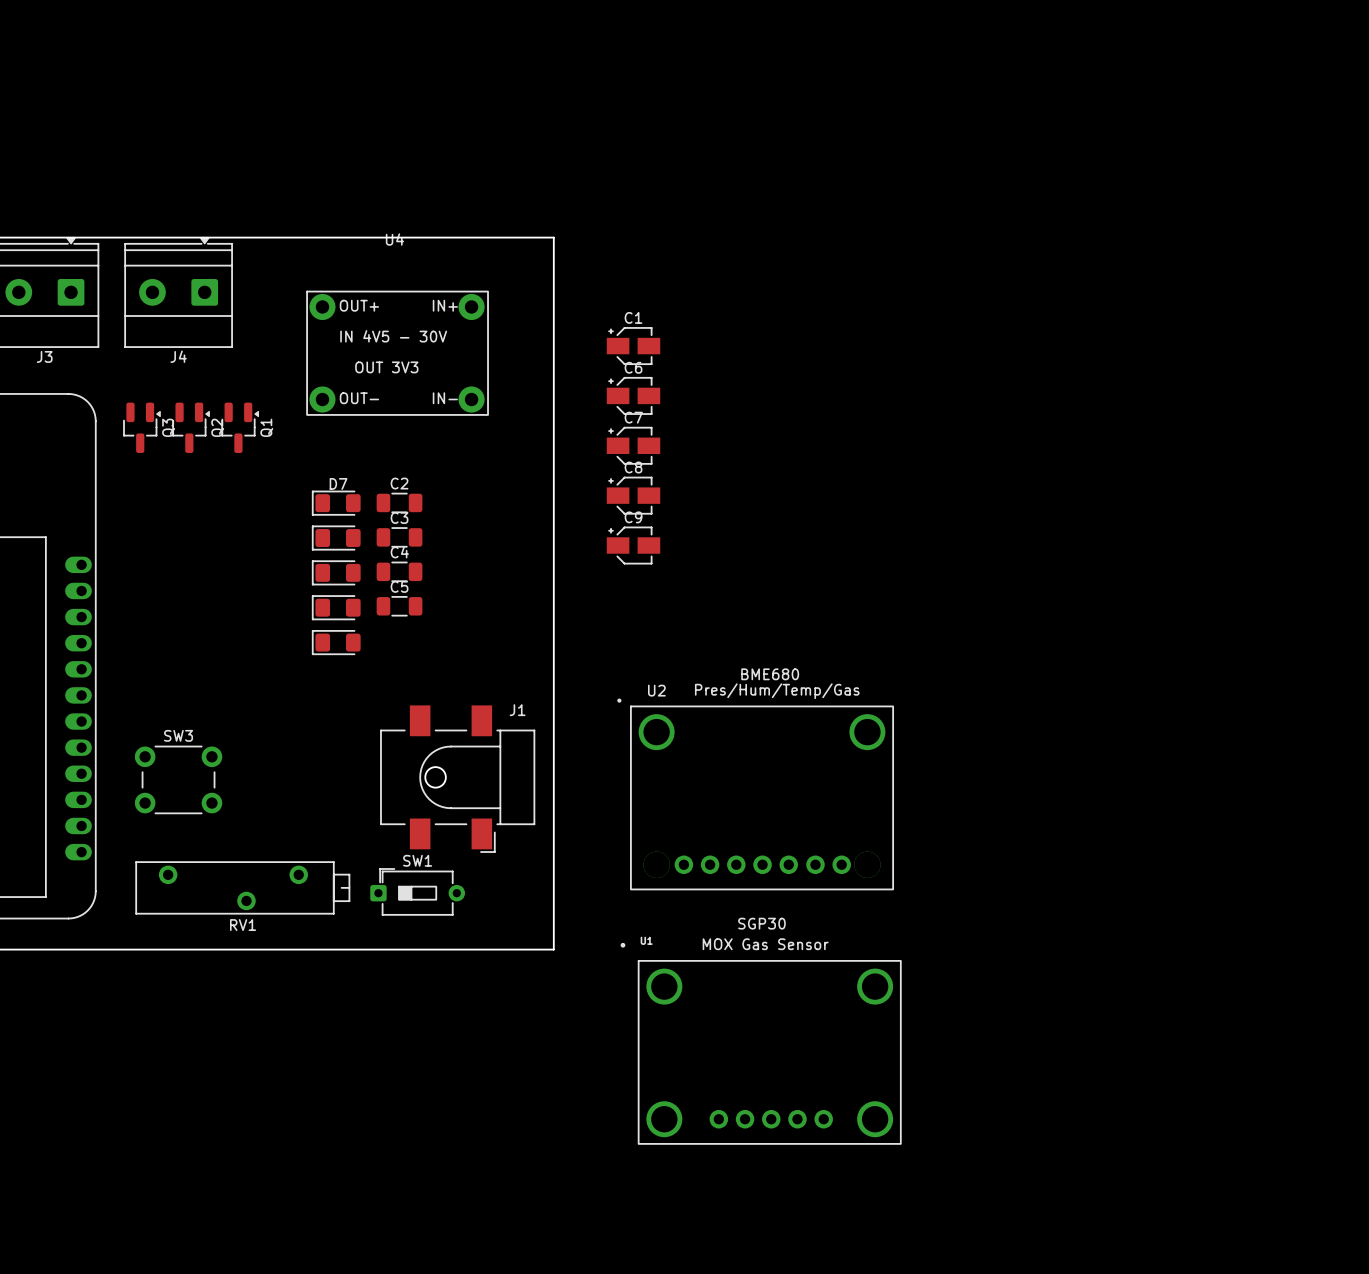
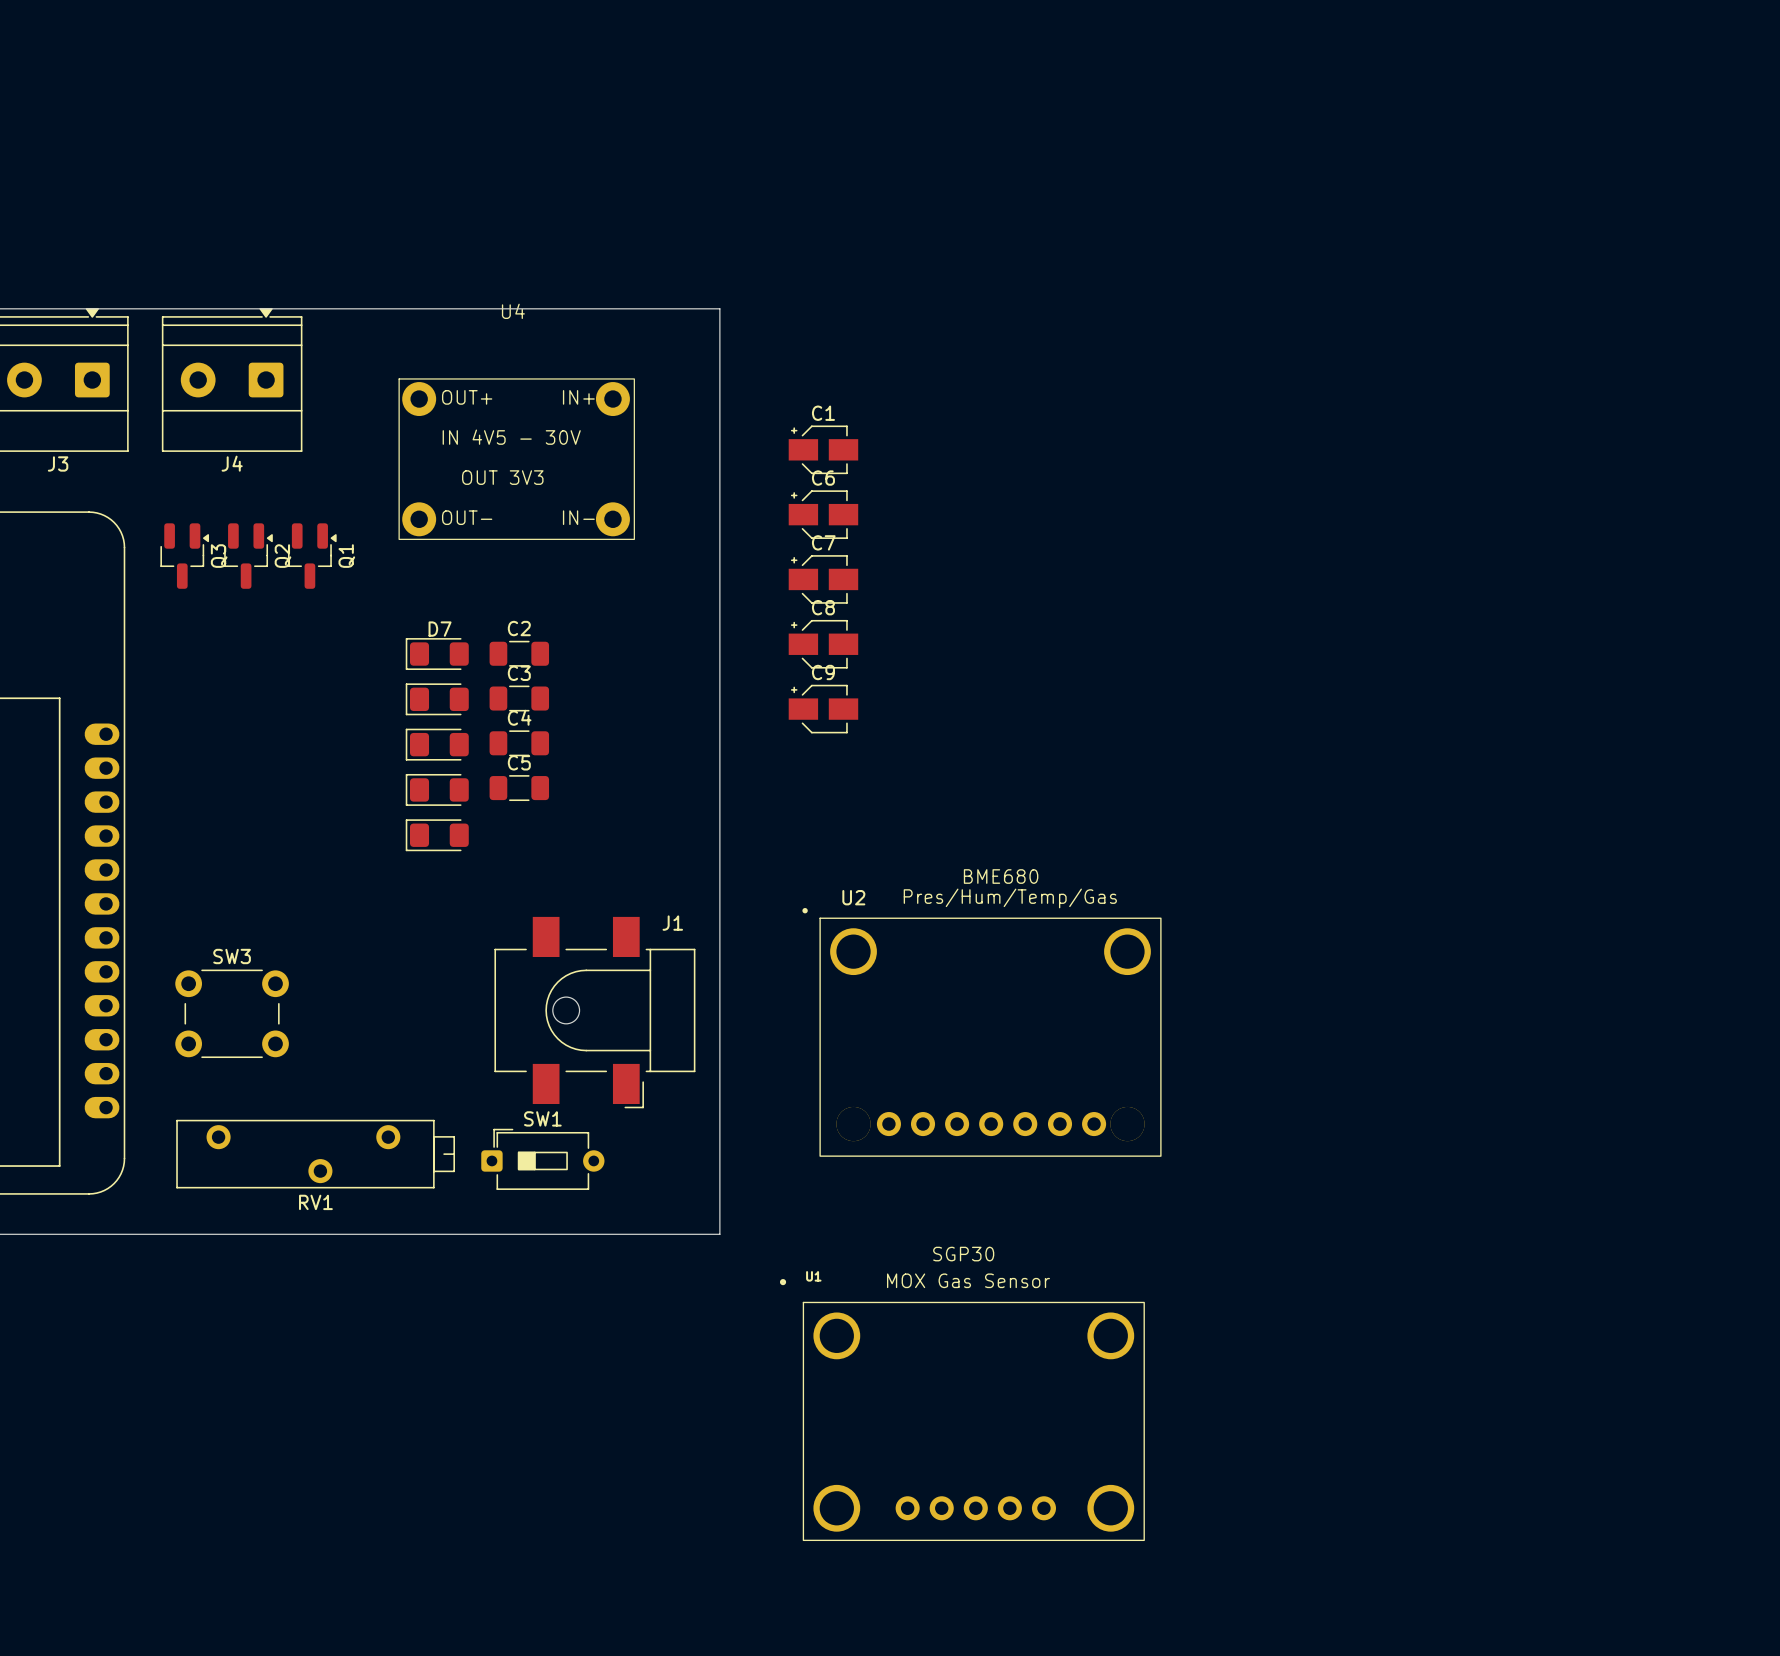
U1 position: (760, 1043) -> (962, 1410)

